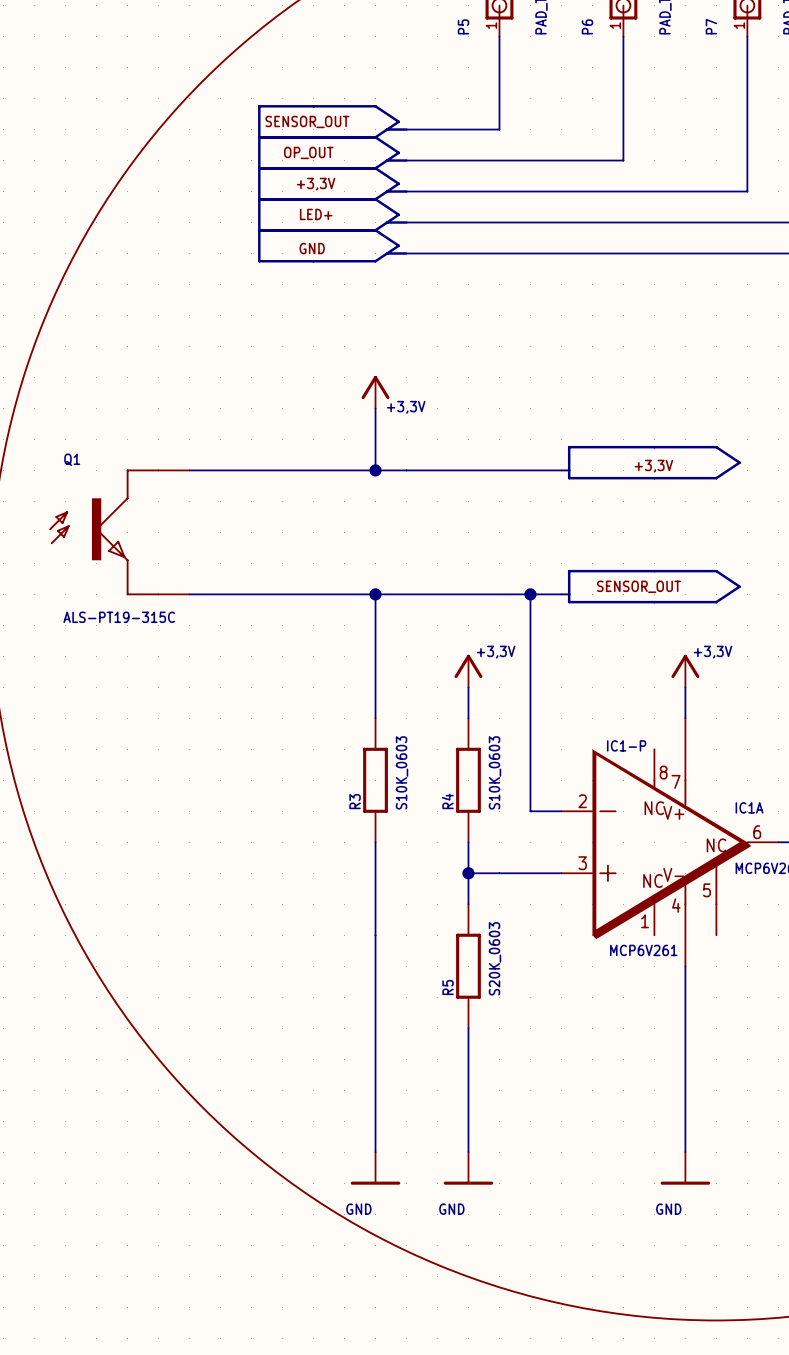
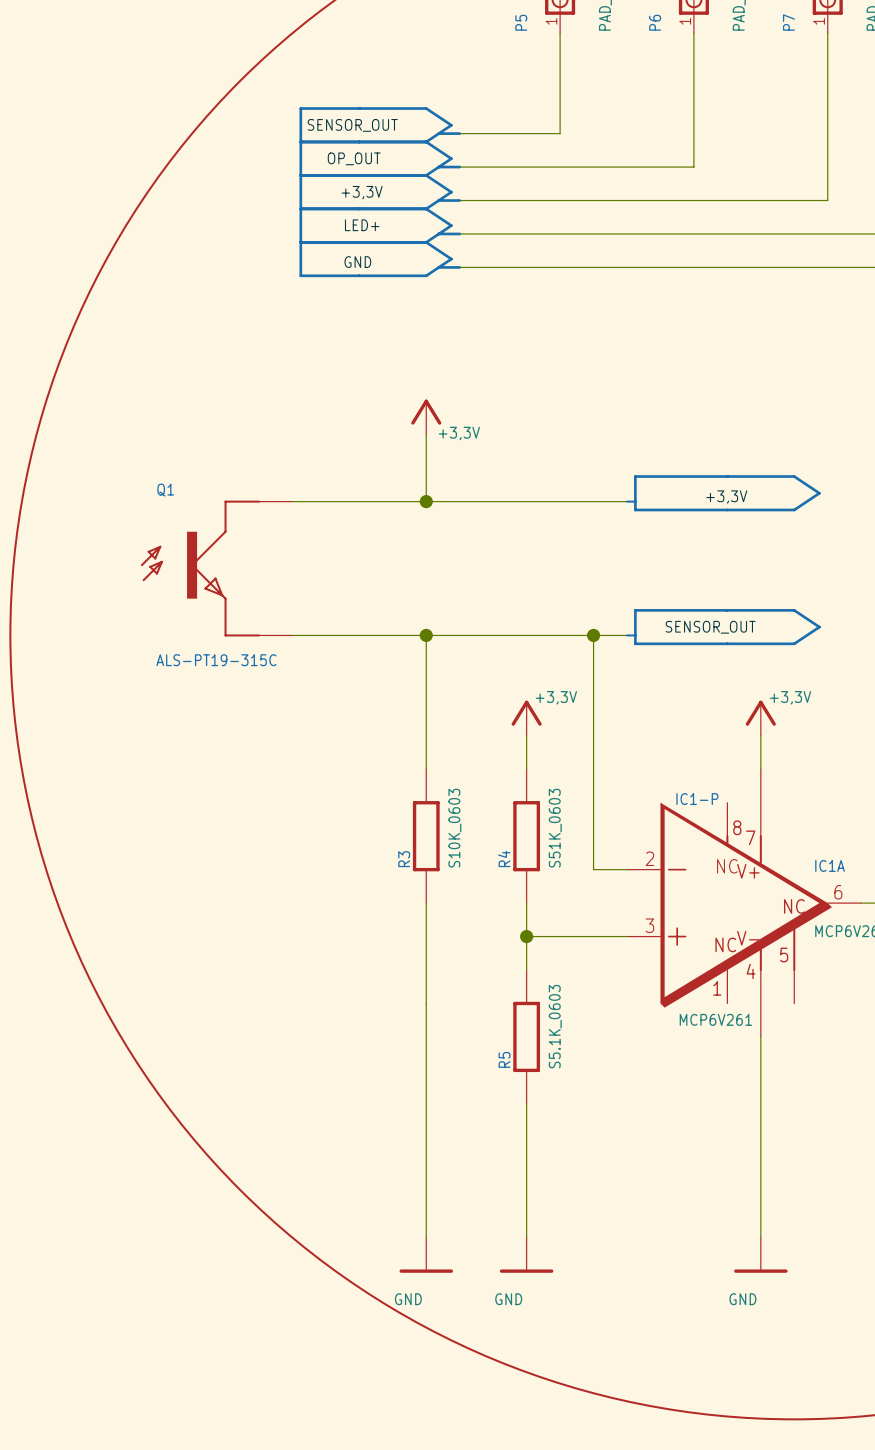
Q1 position: (119, 532) -> (216, 568)
R4 value: S10K_0603 (494, 772) -> S51K_0603 (555, 828)
R5 value: S20K_0603 (494, 958) -> S5.1K_0603 (555, 1026)

